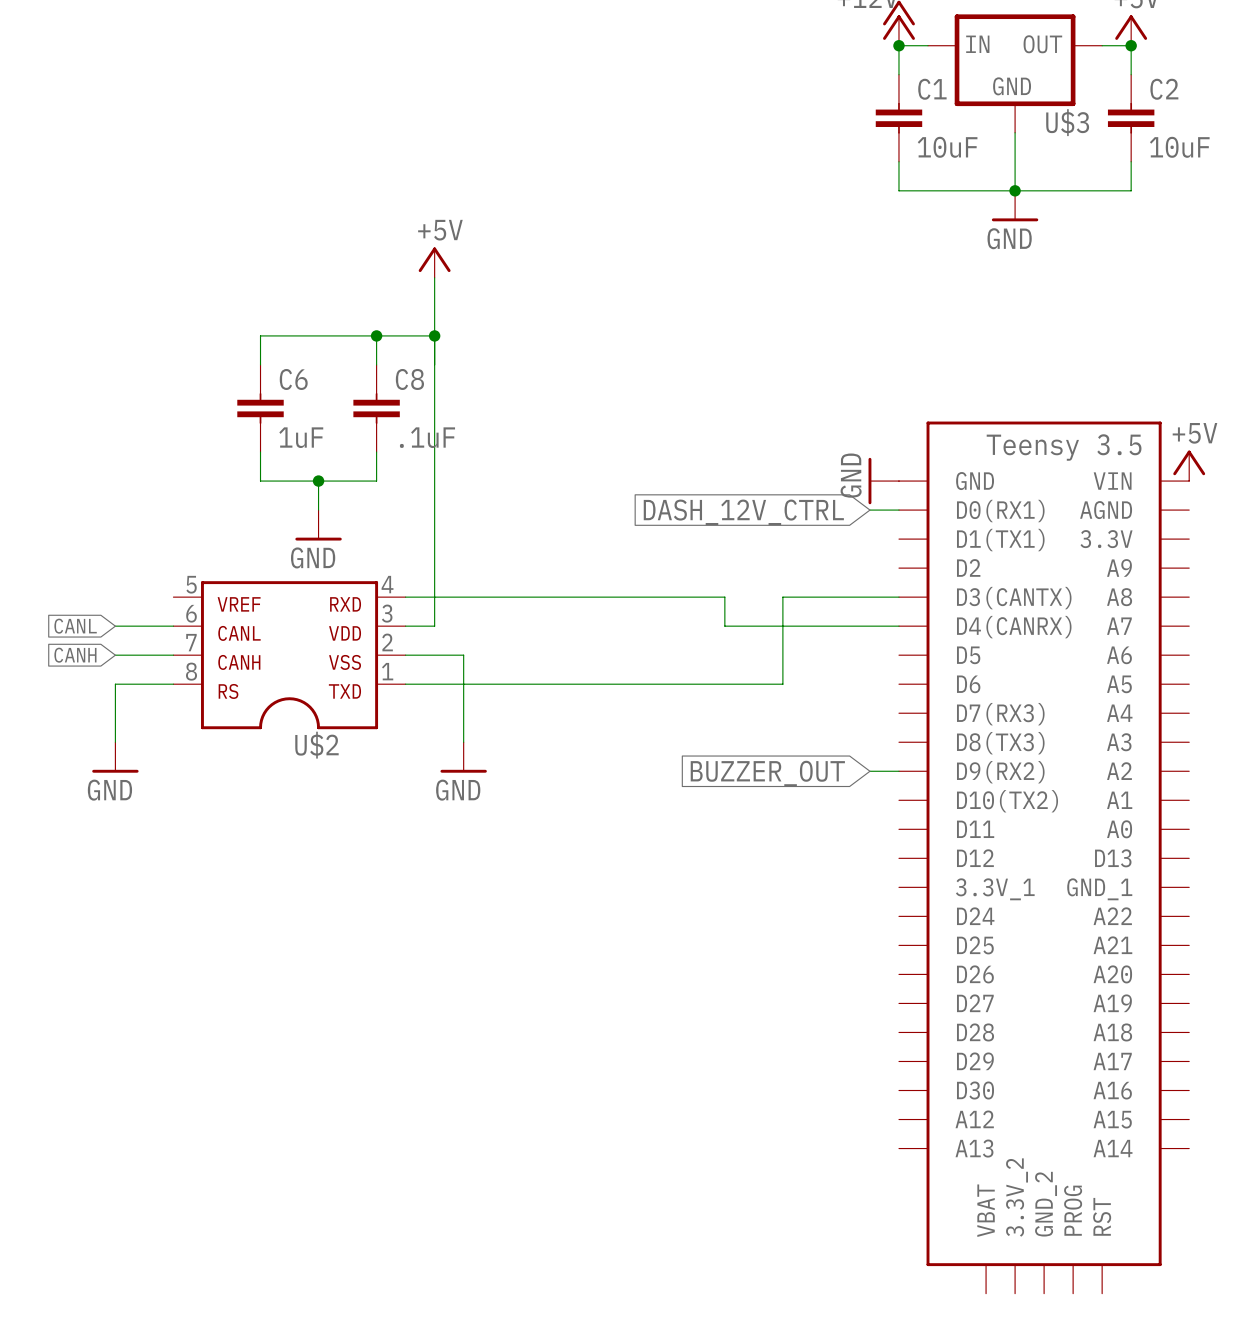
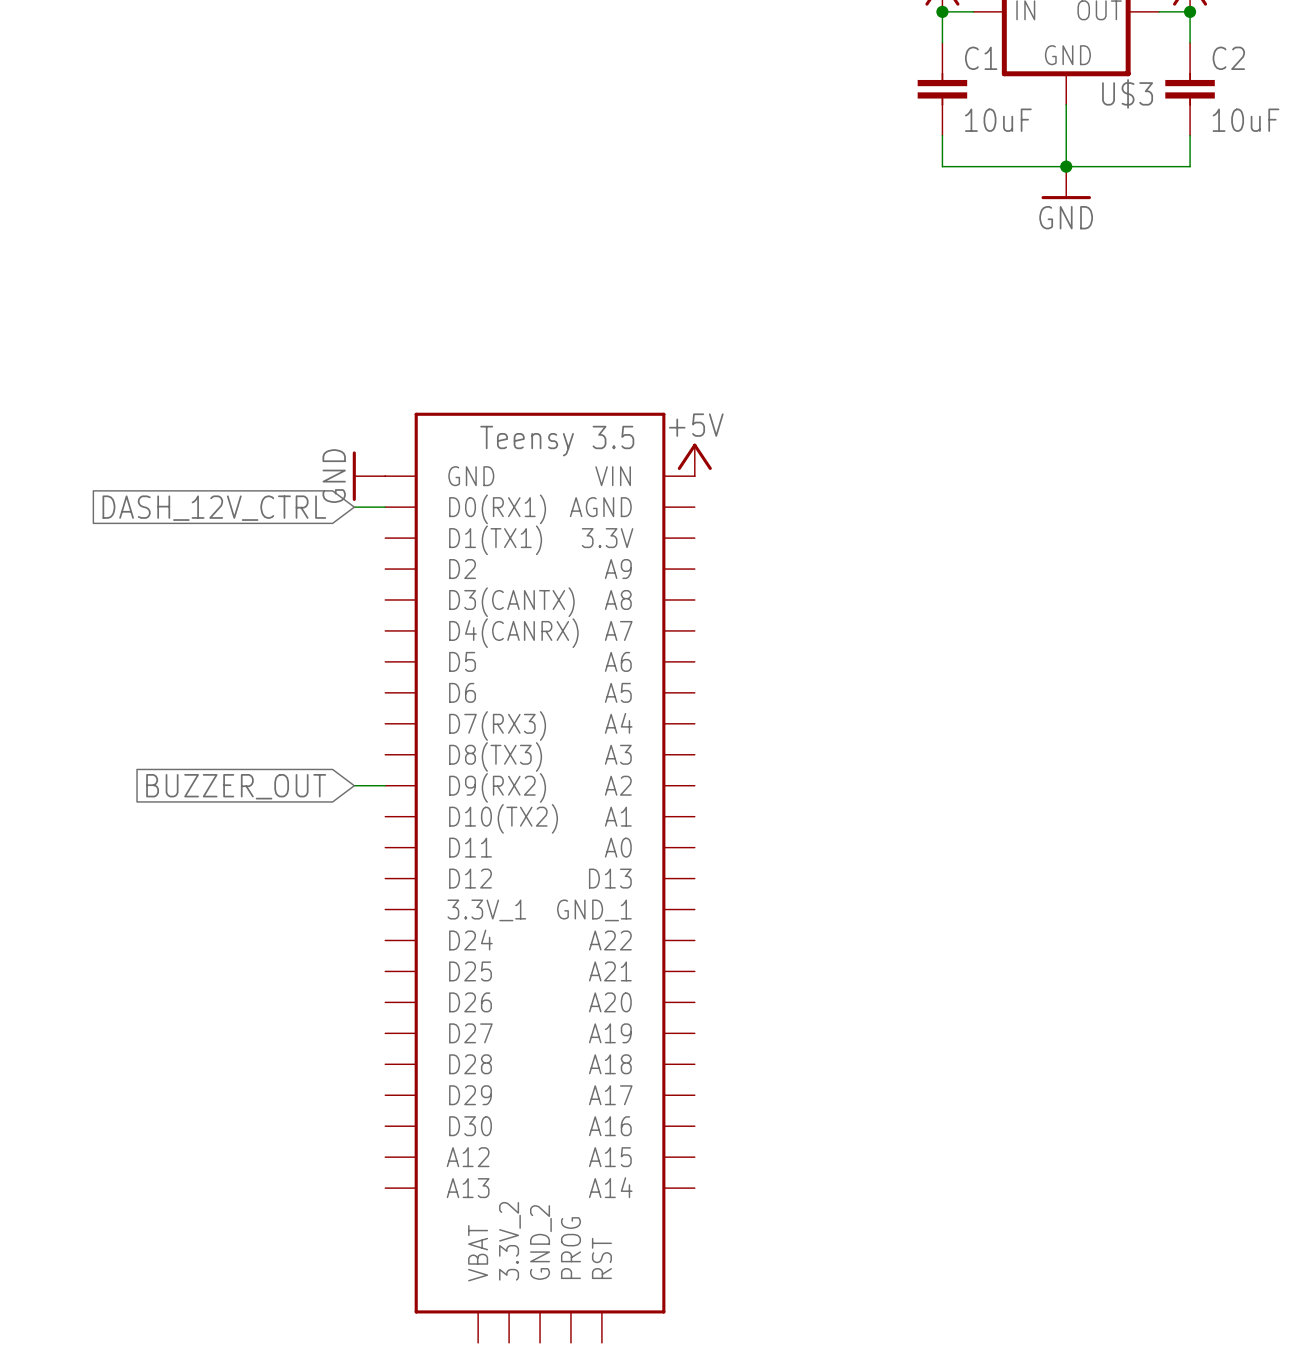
power symbol: +5V (434, 262) -> none
wire: (434, 277) (434, 626) (405, 626) -> none
wire: (376, 335) (376, 364) -> none
junction: (376, 335) -> none
wire: (434, 335) (260, 335) (260, 364) -> none
junction: (434, 335) -> none
C6: 1uF (260, 408) -> none
C8: .1uF (376, 408) -> none
wire: (260, 452) (260, 481) (376, 481) (376, 452) -> none
power symbol: none -> +5V (694, 459)
power symbol: +5V (1189, 465) -> none
wire: (318, 481) (318, 510) -> none
junction: (318, 481) -> none
power symbol: GND (883, 481) -> none
wire: none -> (354, 507) (385, 507)
wire: (869, 510) (898, 510) -> none
global label: none -> DASH_12V_CTRL (214, 508)
global label: DASH_12V_CTRL (743, 512) -> none
power symbol position: GND (318, 525) -> GND (369, 476)
power symbol rotation: 0° (318, 539) -> 90° clockwise (354, 476)
wire: (405, 597) (724, 597) (724, 626) (898, 626) -> none
wire: (898, 597) (782, 597) (782, 684) (405, 684) -> none
global label: CANL (75, 626) -> none
wire: (115, 626) (173, 626) -> none
global label: CANH (75, 655) -> none
wire: (115, 655) (173, 655) -> none
U$2: (289, 655) -> none
wire: (405, 655) (463, 655) (463, 742) -> none
wire: (173, 684) (115, 684) (115, 742) -> none
power symbol: GND (115, 757) -> none
power symbol: GND (463, 757) -> none
wire: none -> (354, 785) (385, 785)
wire: (869, 771) (898, 771) -> none
global label: none -> BUZZER_OUT (236, 786)
global label: BUZZER_OUT (767, 773) -> none
part: none -> (540, 877)
part: (1044, 857) -> none

